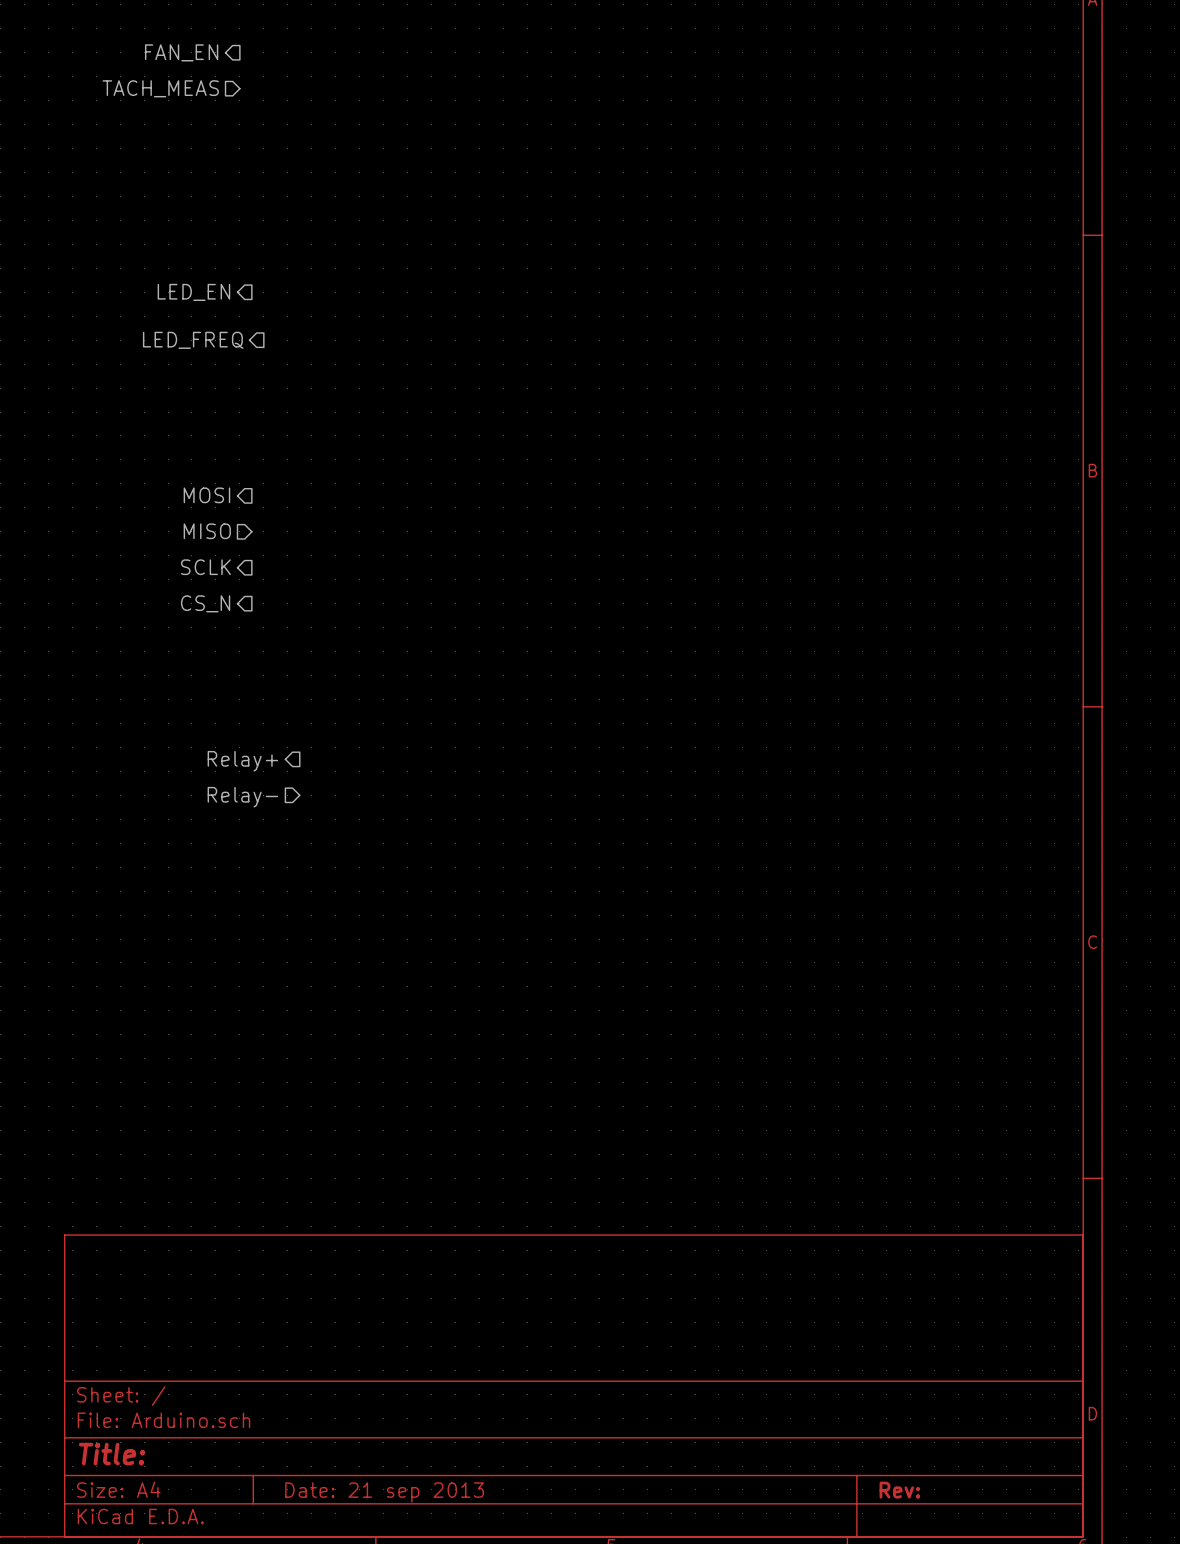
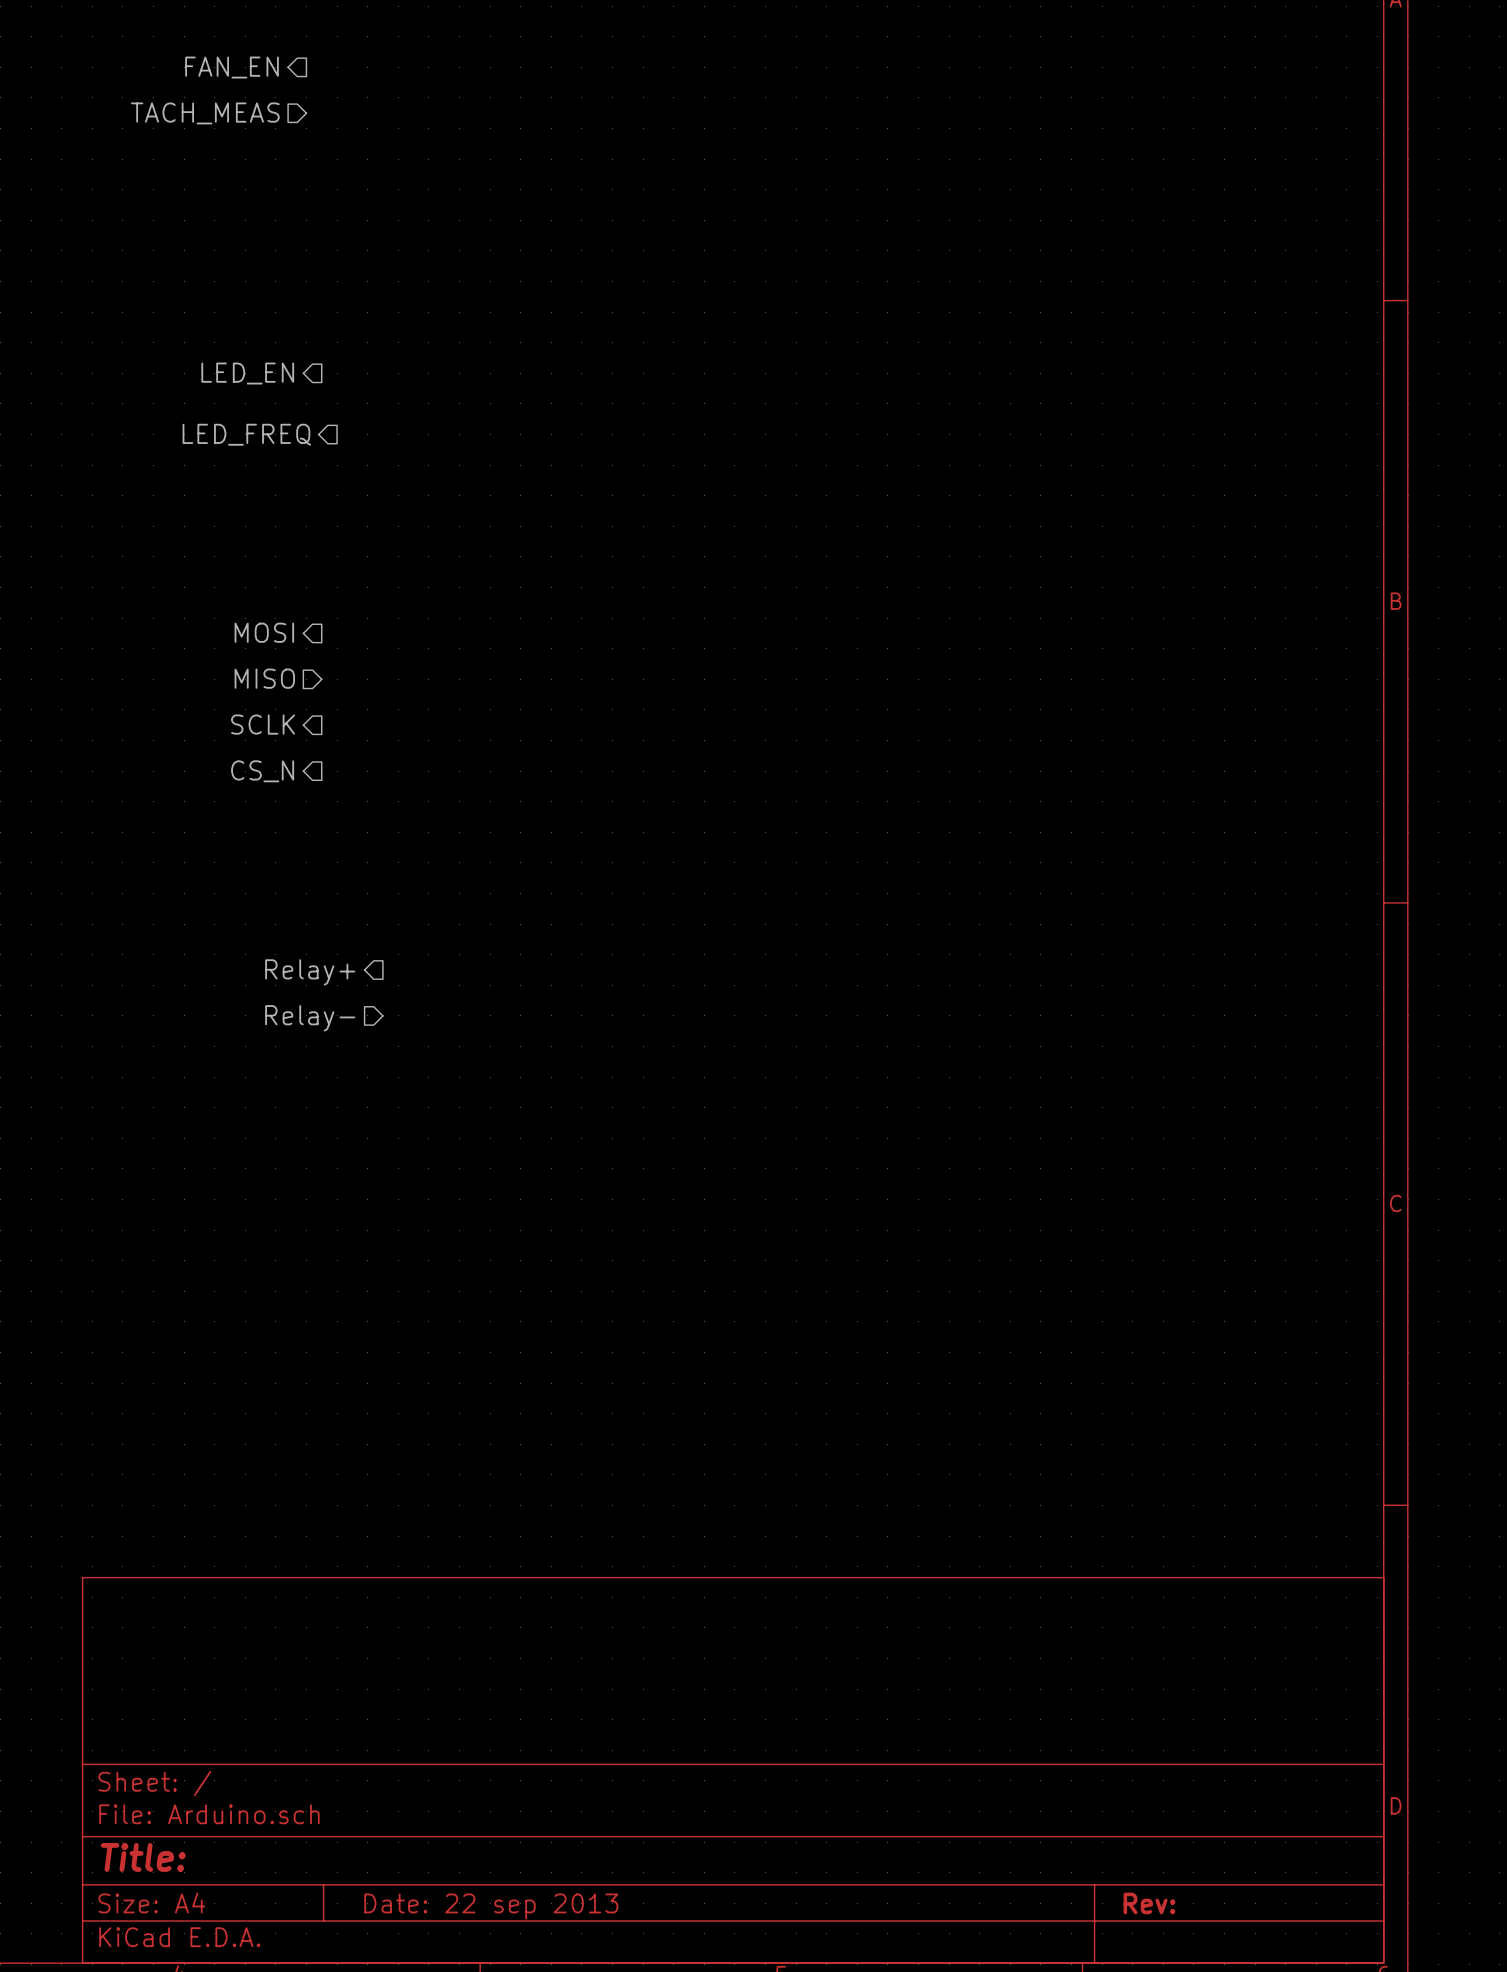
title block: Date: 21 sep 2013 (384, 1492) -> Date: 22 sep 2013 (491, 1906)

